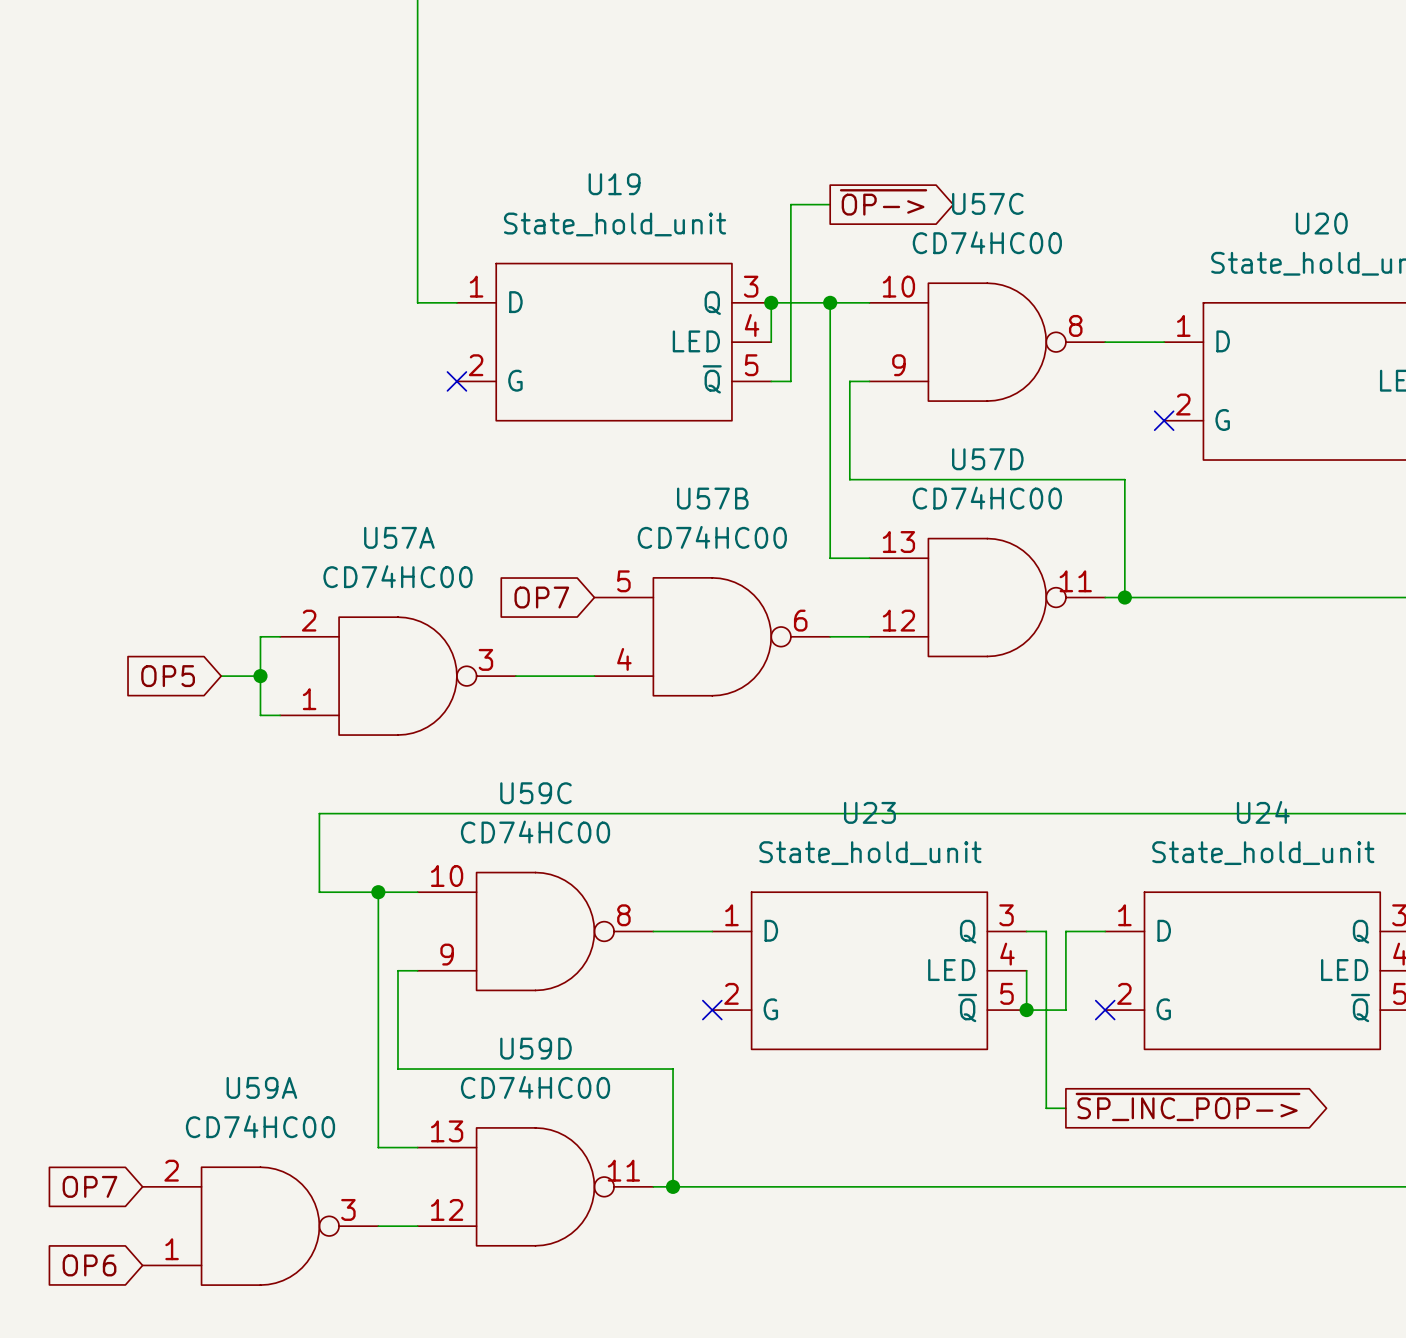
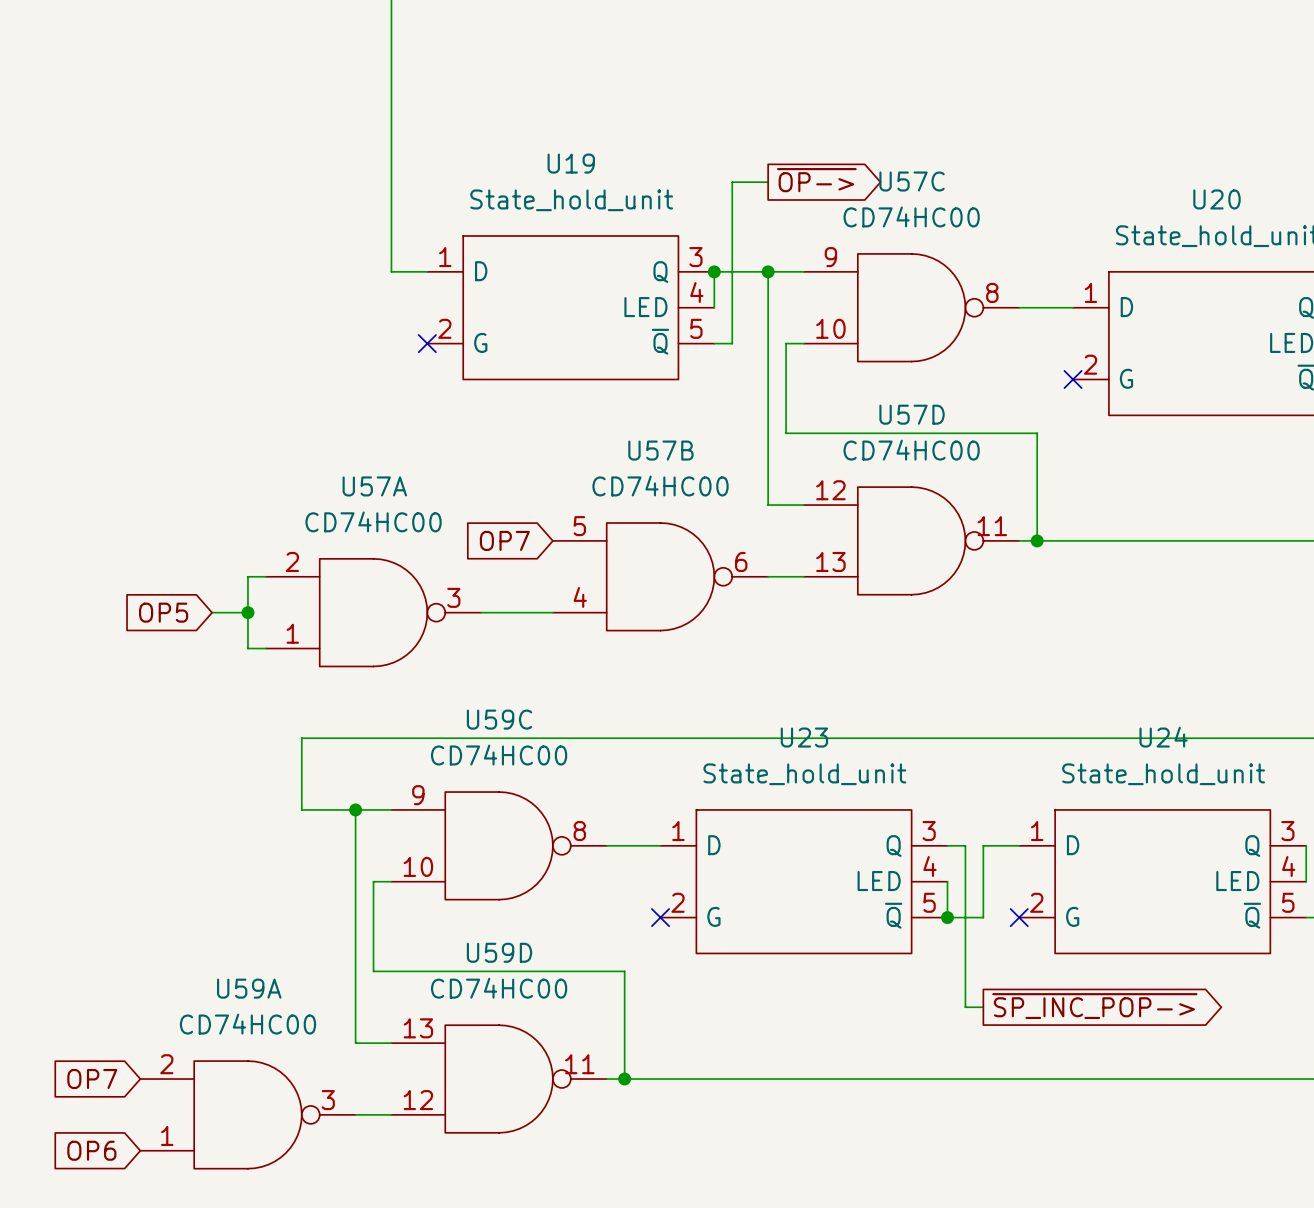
U57C flip: as is (987, 342) -> up-down (911, 307)
U57D flip: as is (987, 597) -> up-down (911, 540)
U59C flip: as is (535, 931) -> up-down (499, 845)

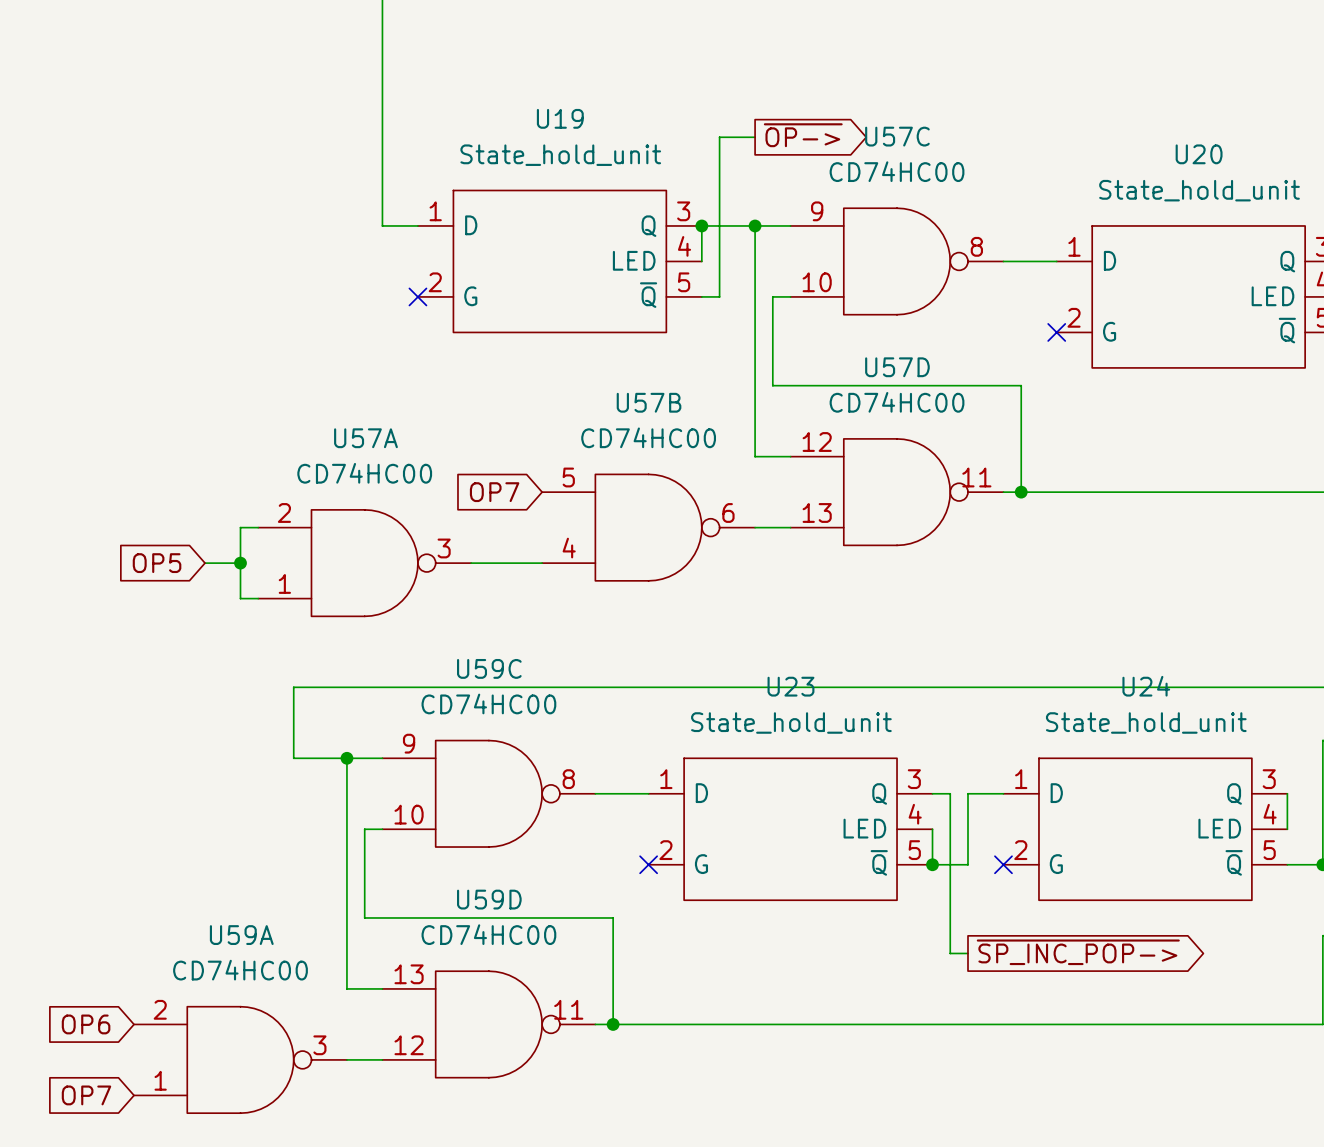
global label: OP7 (92, 1079) -> OP6 (86, 1024)
global label: OP6 (91, 1150) -> OP7 (86, 1095)

